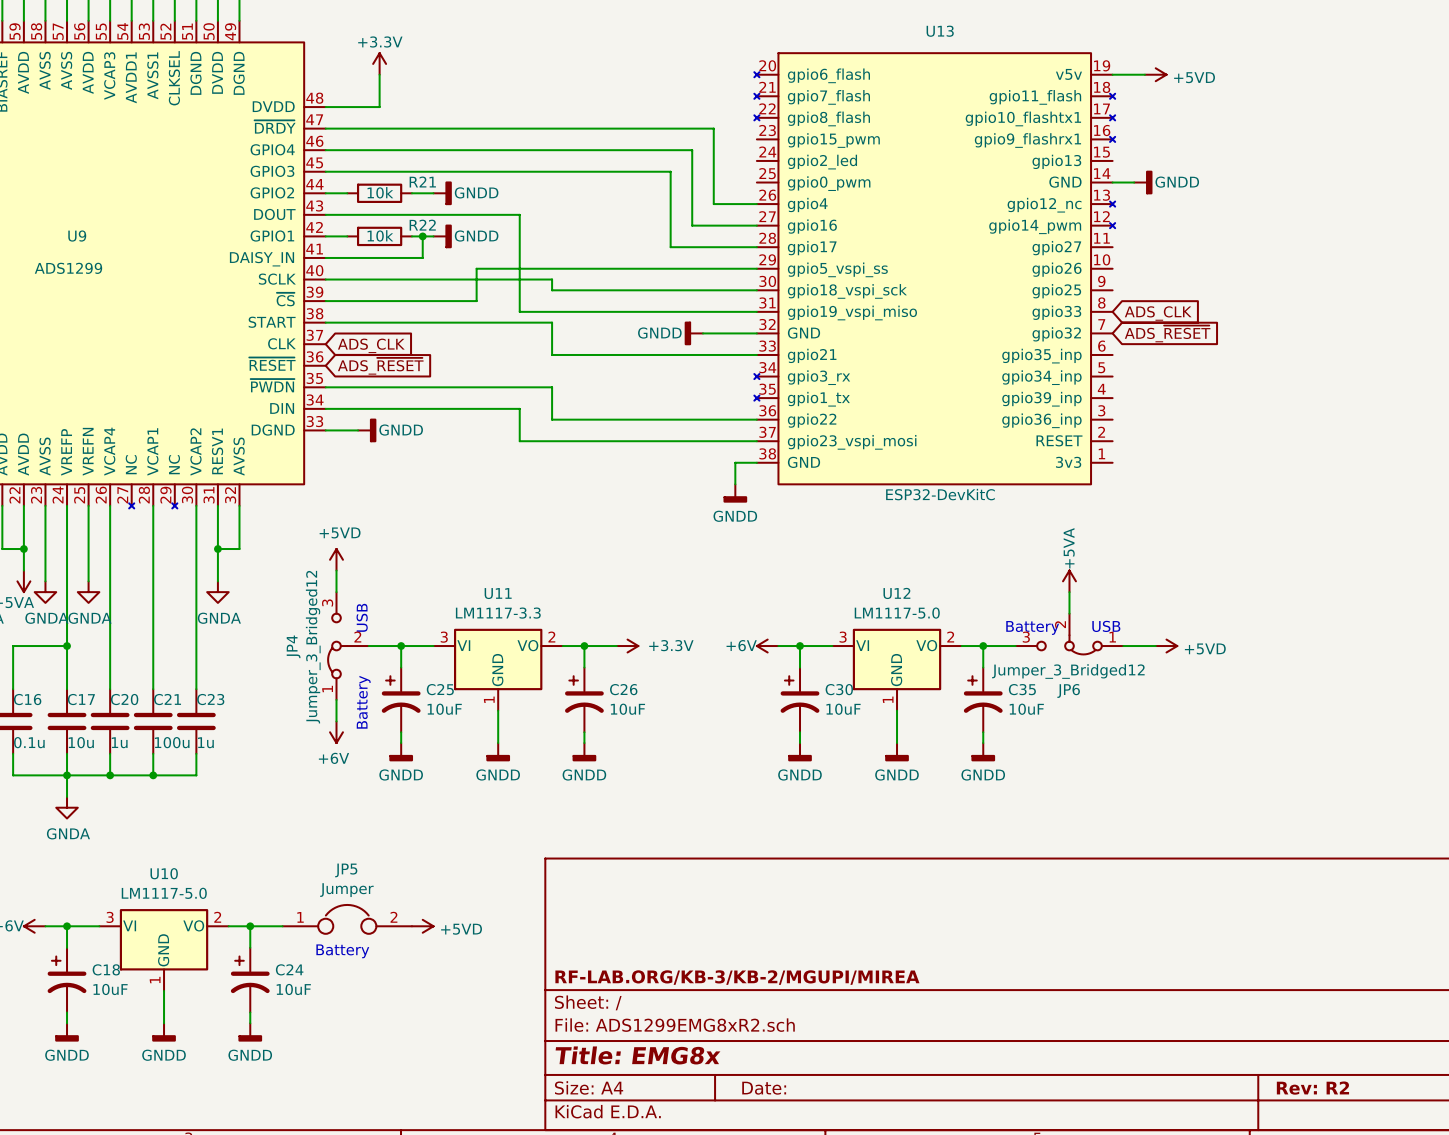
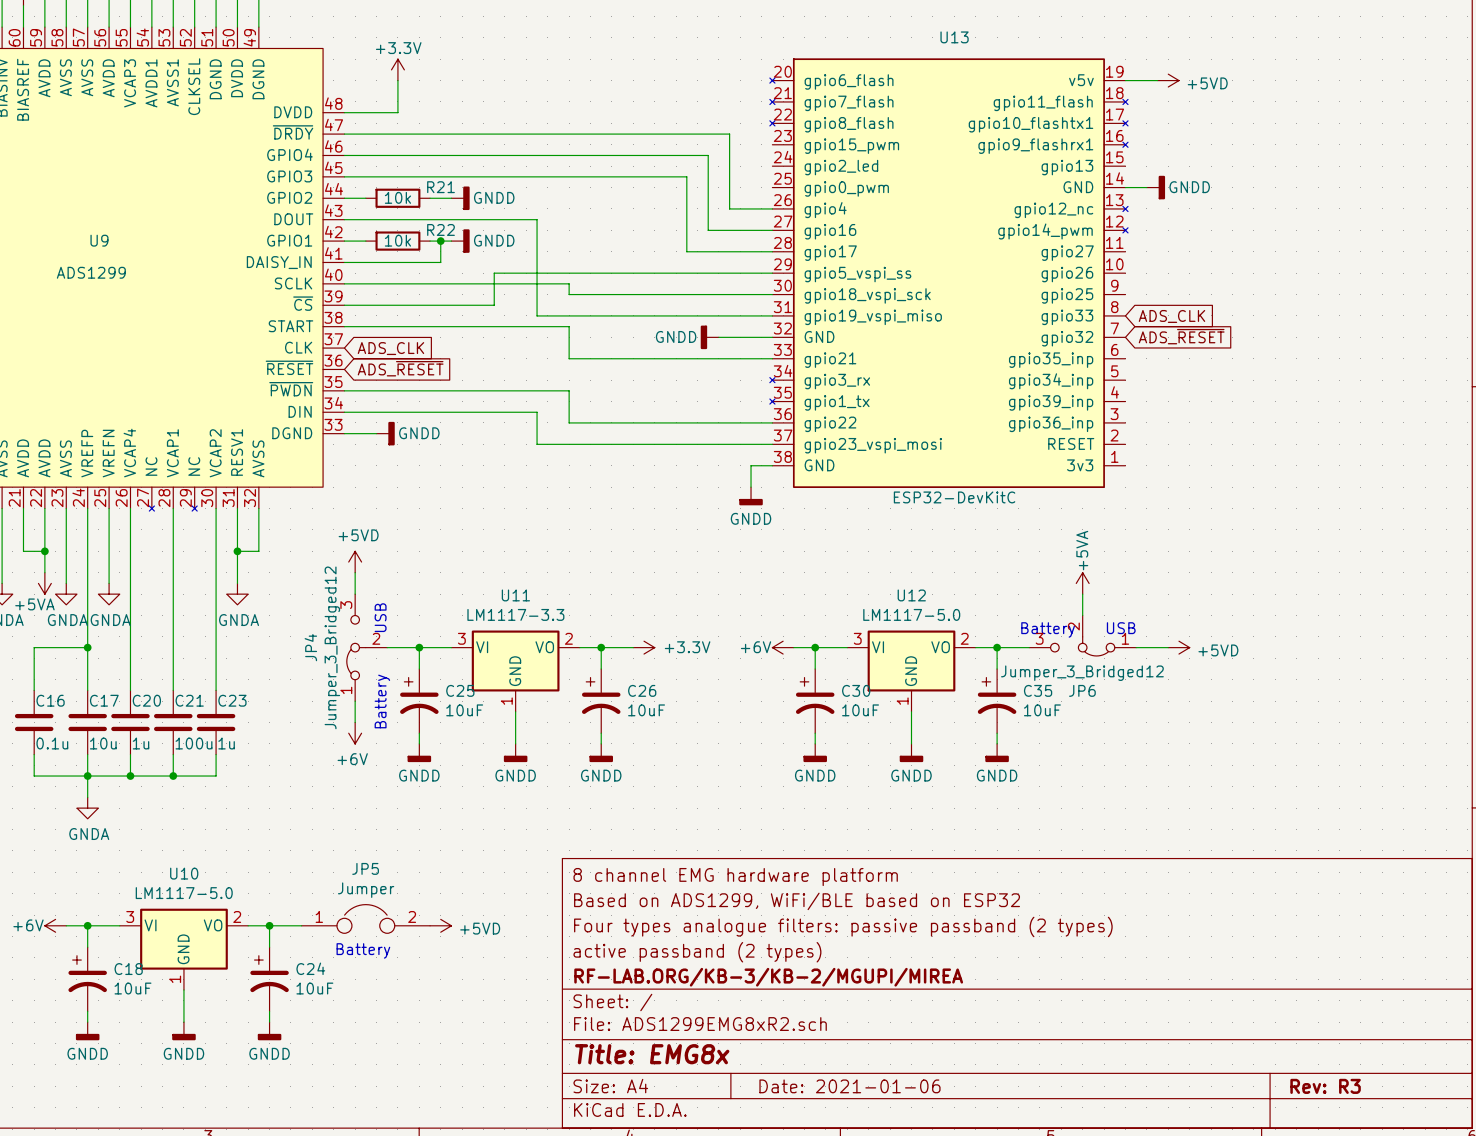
title block: none -> 8 channel EMG hardware platform (735, 877)
title block: none -> Based on ADS1299, WiFi/BLE based on ESP32 (797, 901)
title block: none -> Four types analogue filters: passive passband (2 types) (843, 926)
title block: none -> active passband (2 types) (697, 952)
title block: Date: (764, 1088) -> Date: 2021-01-06 (849, 1086)
title block: Rev: R2 (1312, 1088) -> Rev: R3 (1325, 1086)

